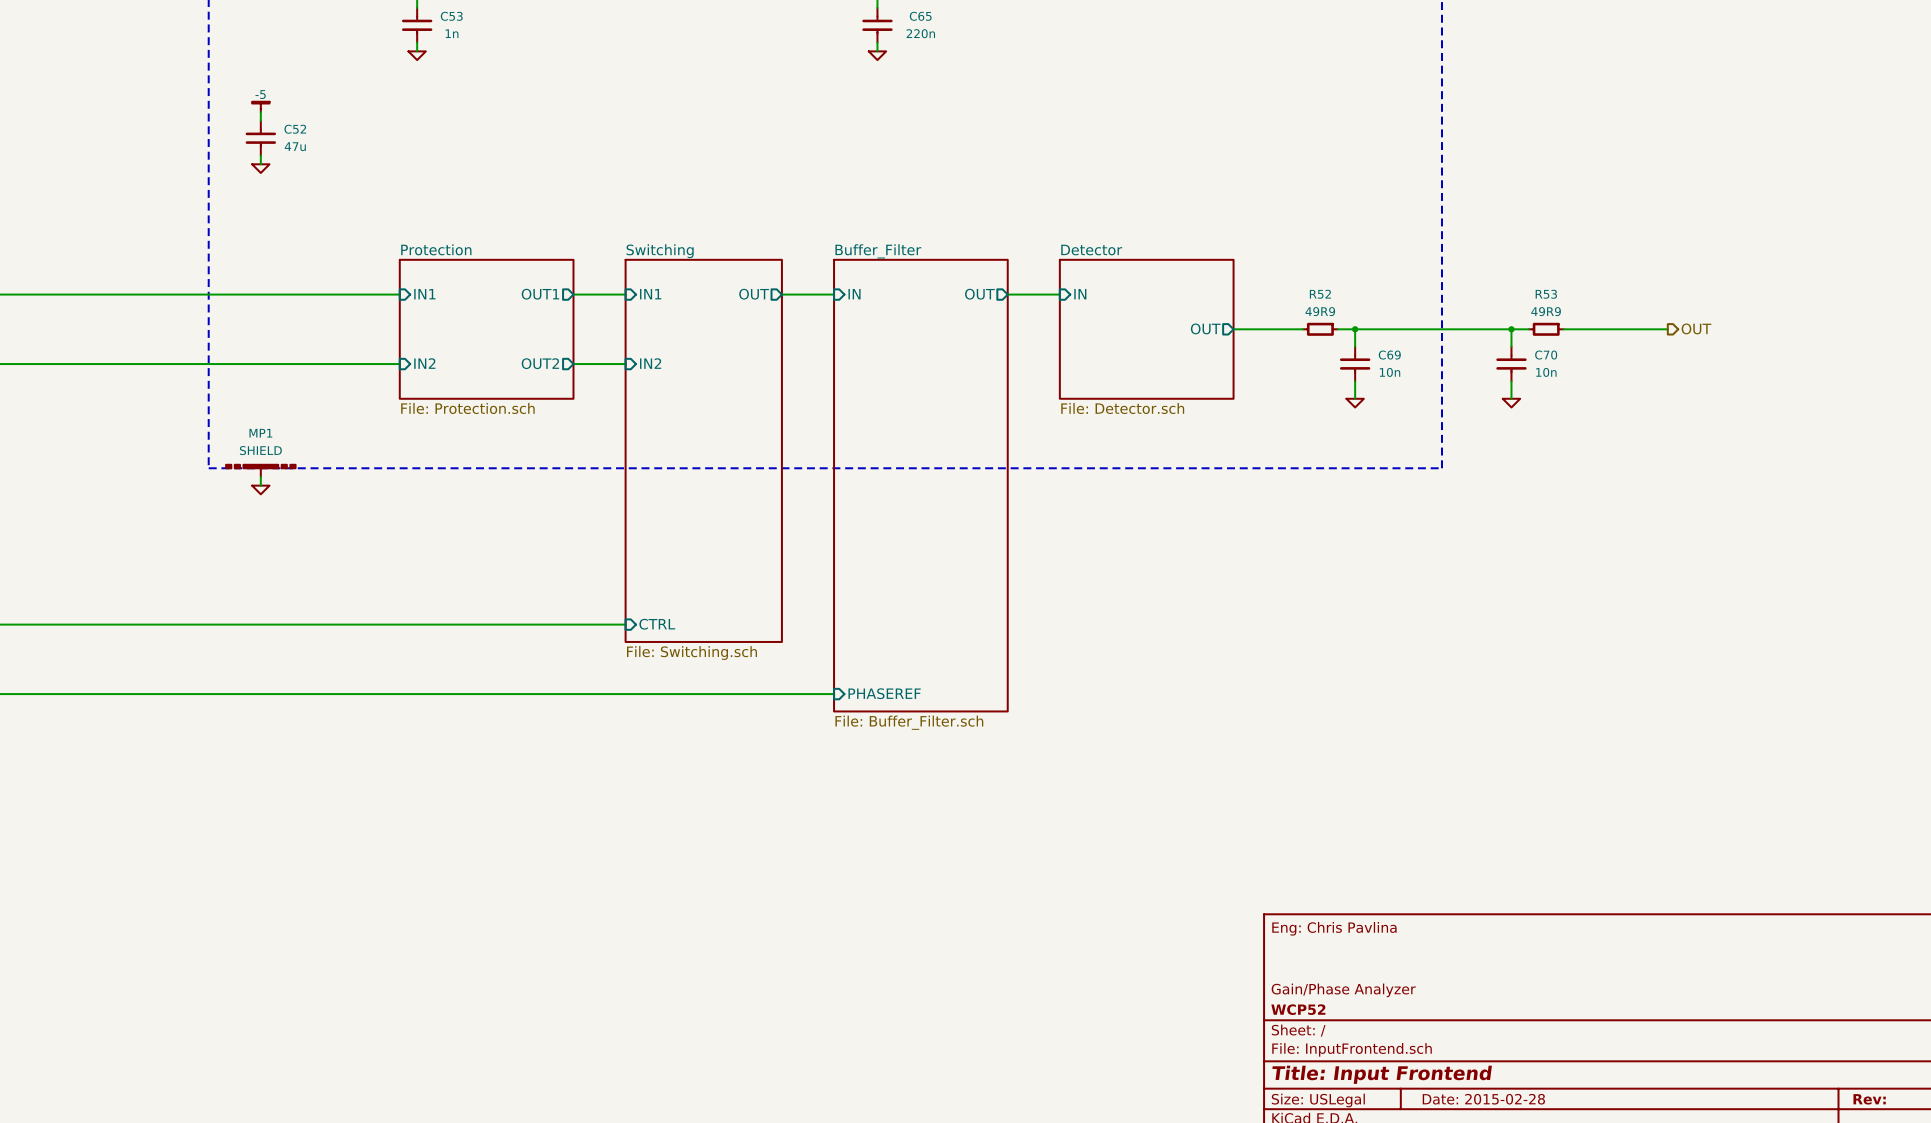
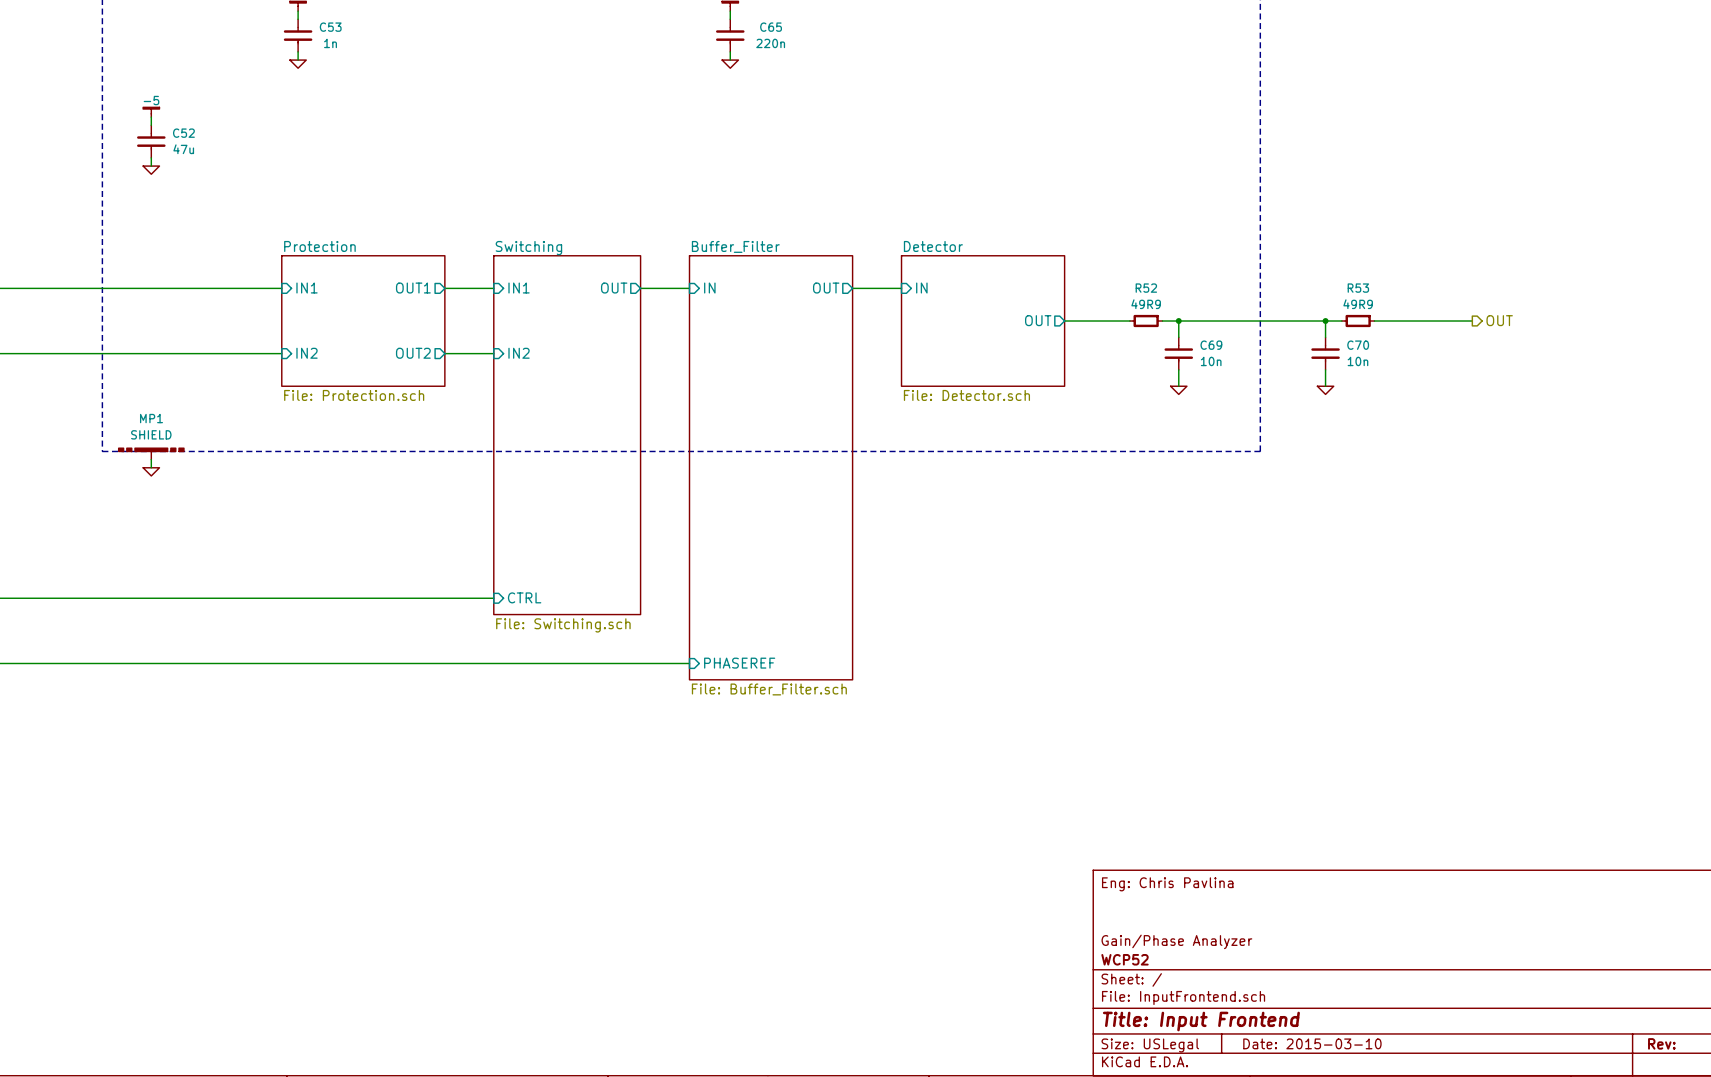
title block: Date: 2015-02-28 (1483, 1099) -> Date: 2015-03-10 (1312, 1043)

